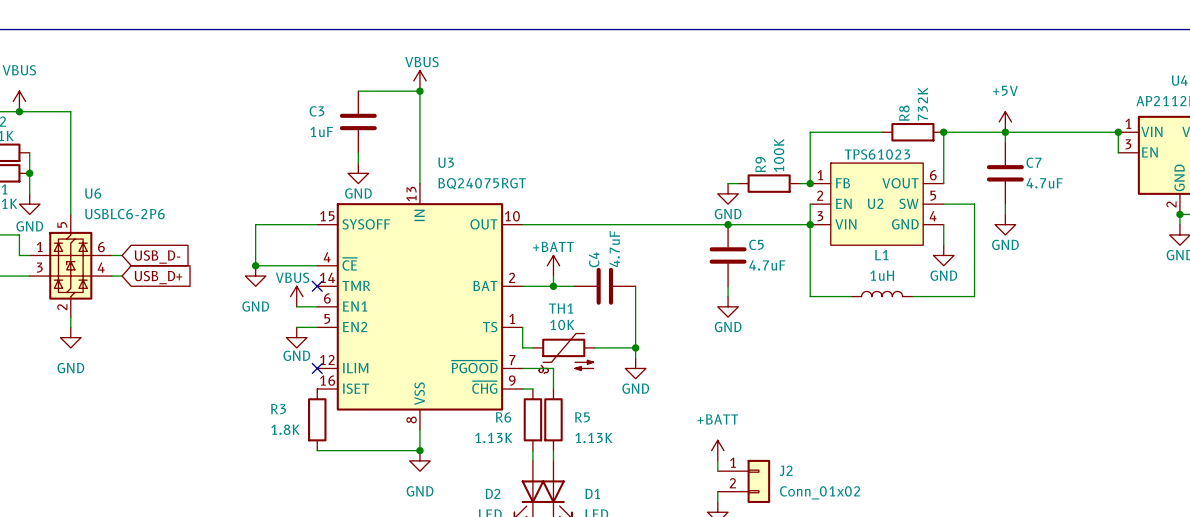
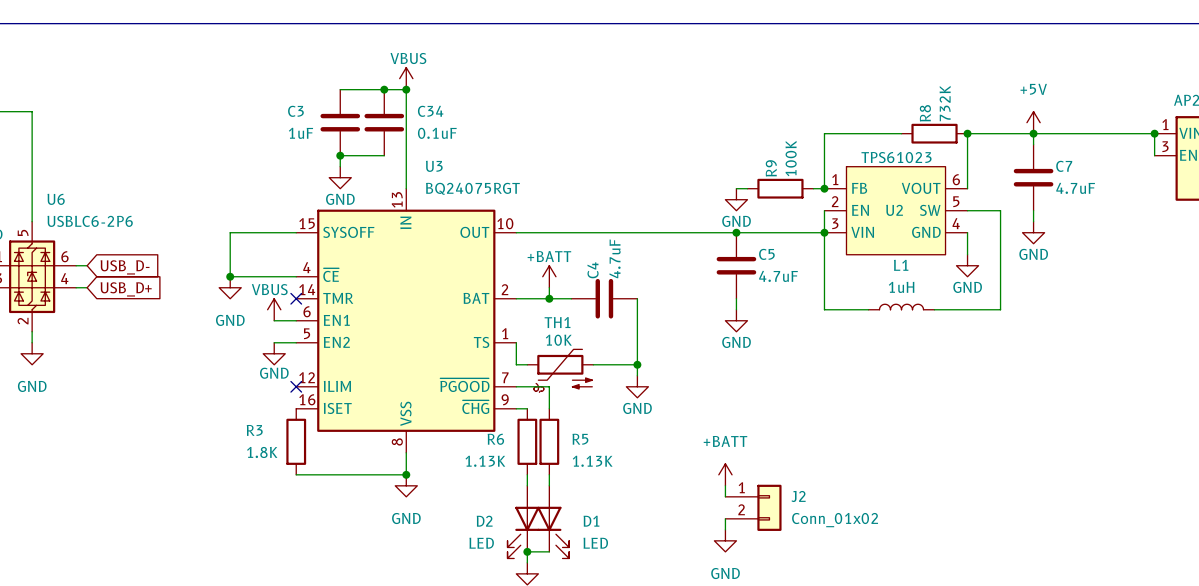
junction: none -> (384, 89)
C34: none -> 0.1uF (384, 122)
wire: none -> (340, 155) (384, 155)
junction: none -> (340, 155)

